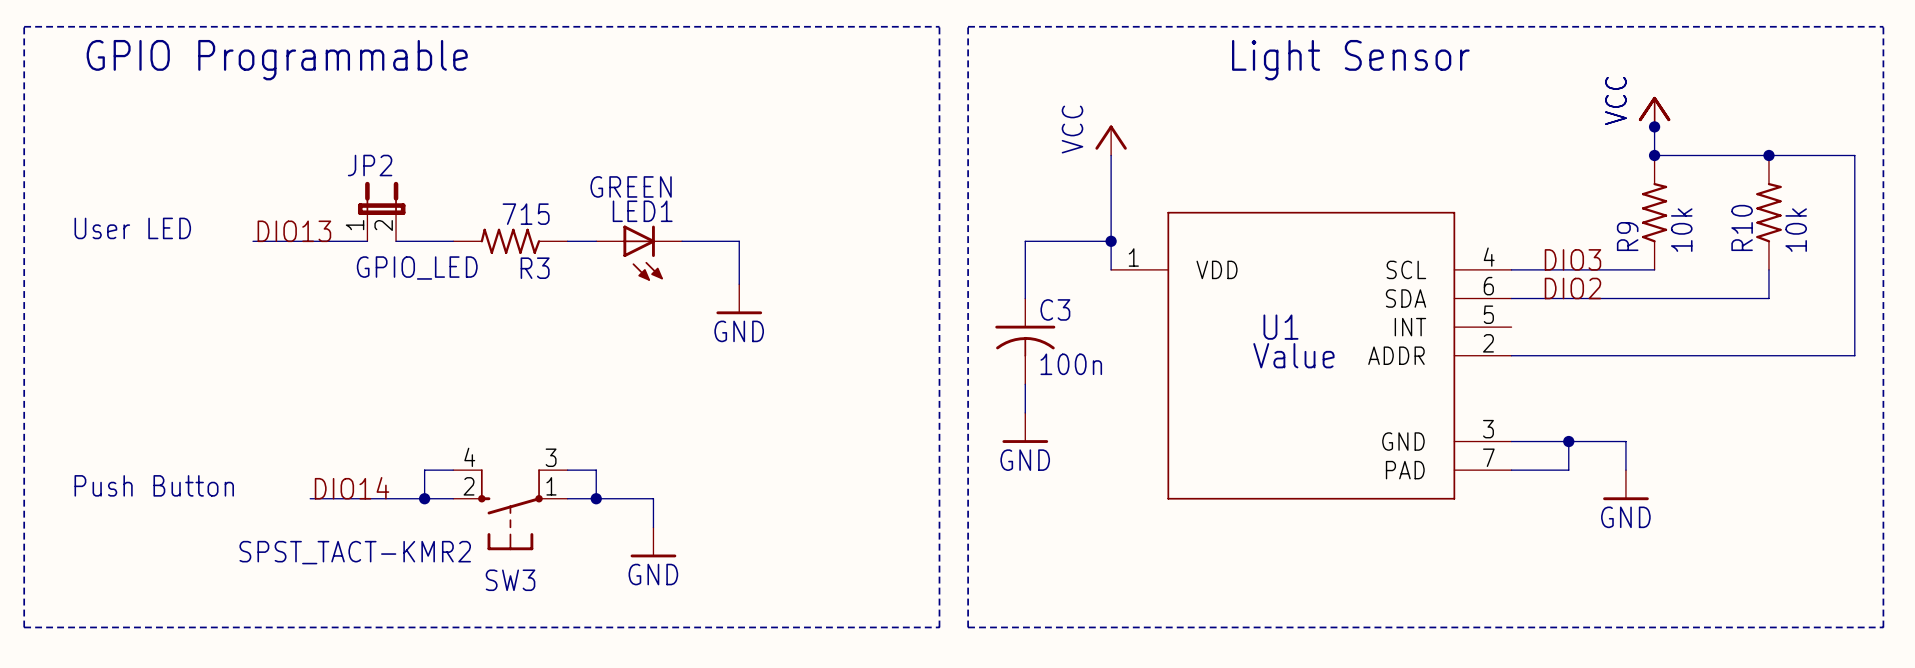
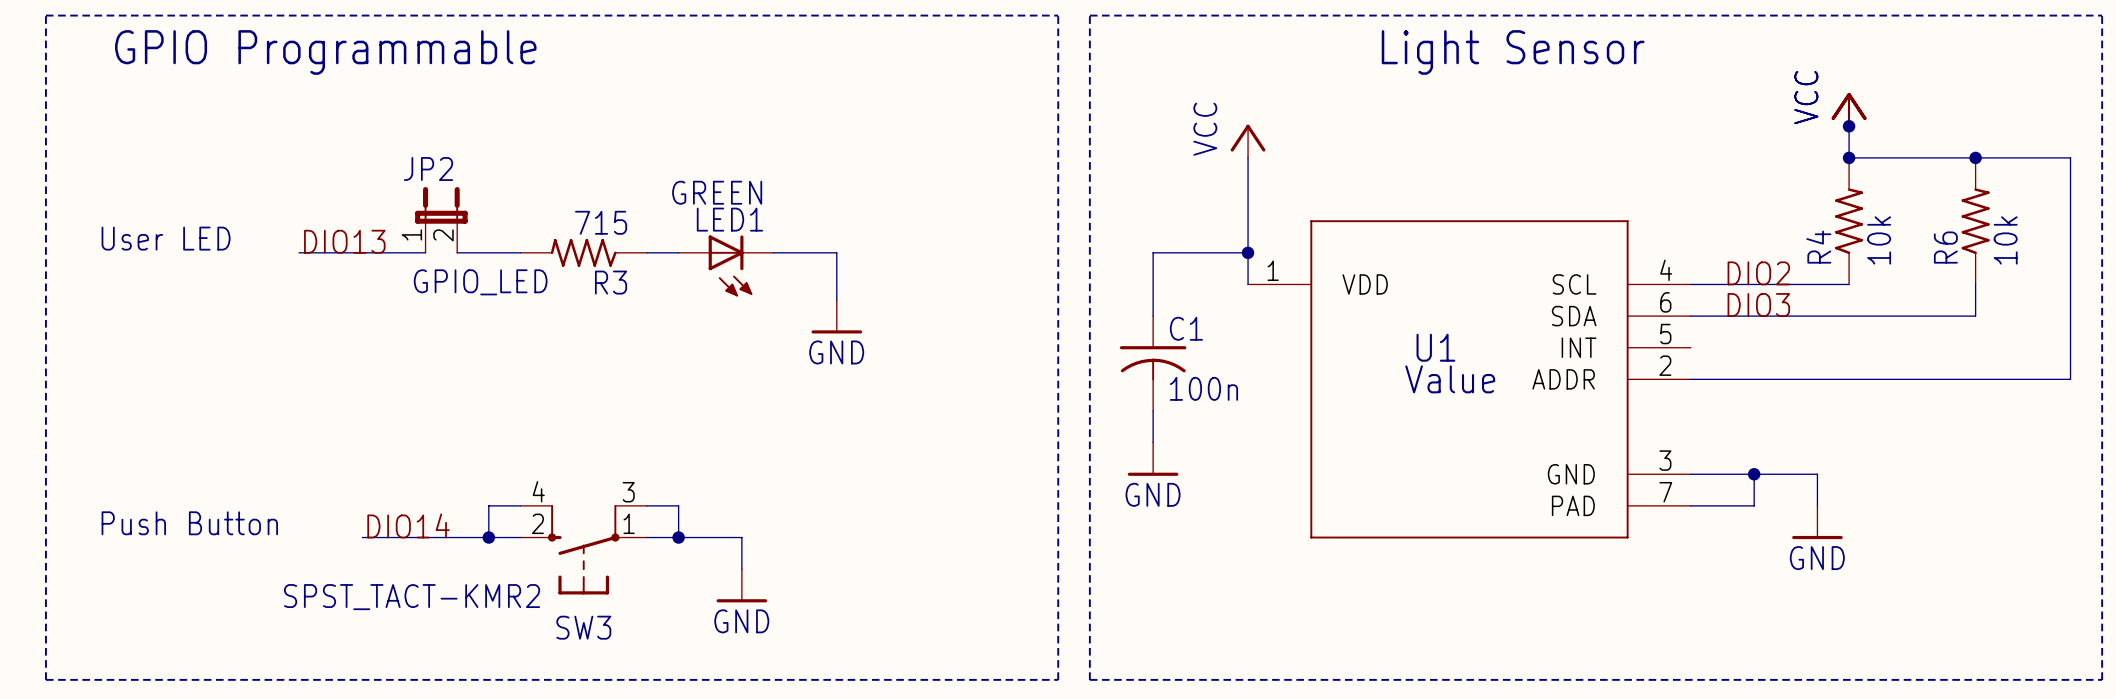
R10 name: R10 (1742, 227) -> R6 (1945, 247)
R9 name: R9 (1627, 236) -> R4 (1818, 247)
label: DIO3 (1572, 259) -> DIO2 (1758, 273)
label: DIO2 (1572, 288) -> DIO3 (1758, 305)
C3 name: C3 (1055, 309) -> C1 (1186, 328)

